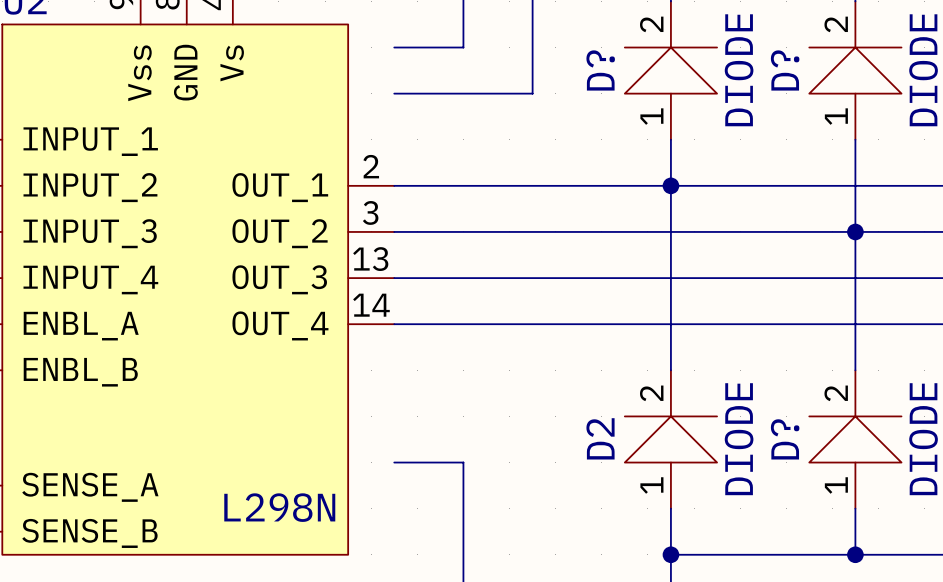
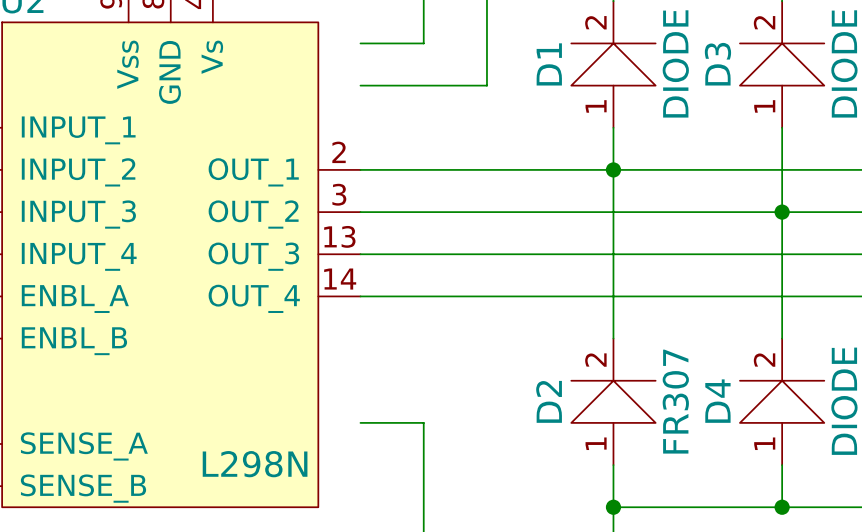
D? name: D? (600, 70) -> D1 (549, 64)
D? name: D? (785, 70) -> D3 (717, 64)
D2 value: DIODE (739, 439) -> FR307 (675, 401)
D? name: D? (785, 439) -> D4 (717, 401)

